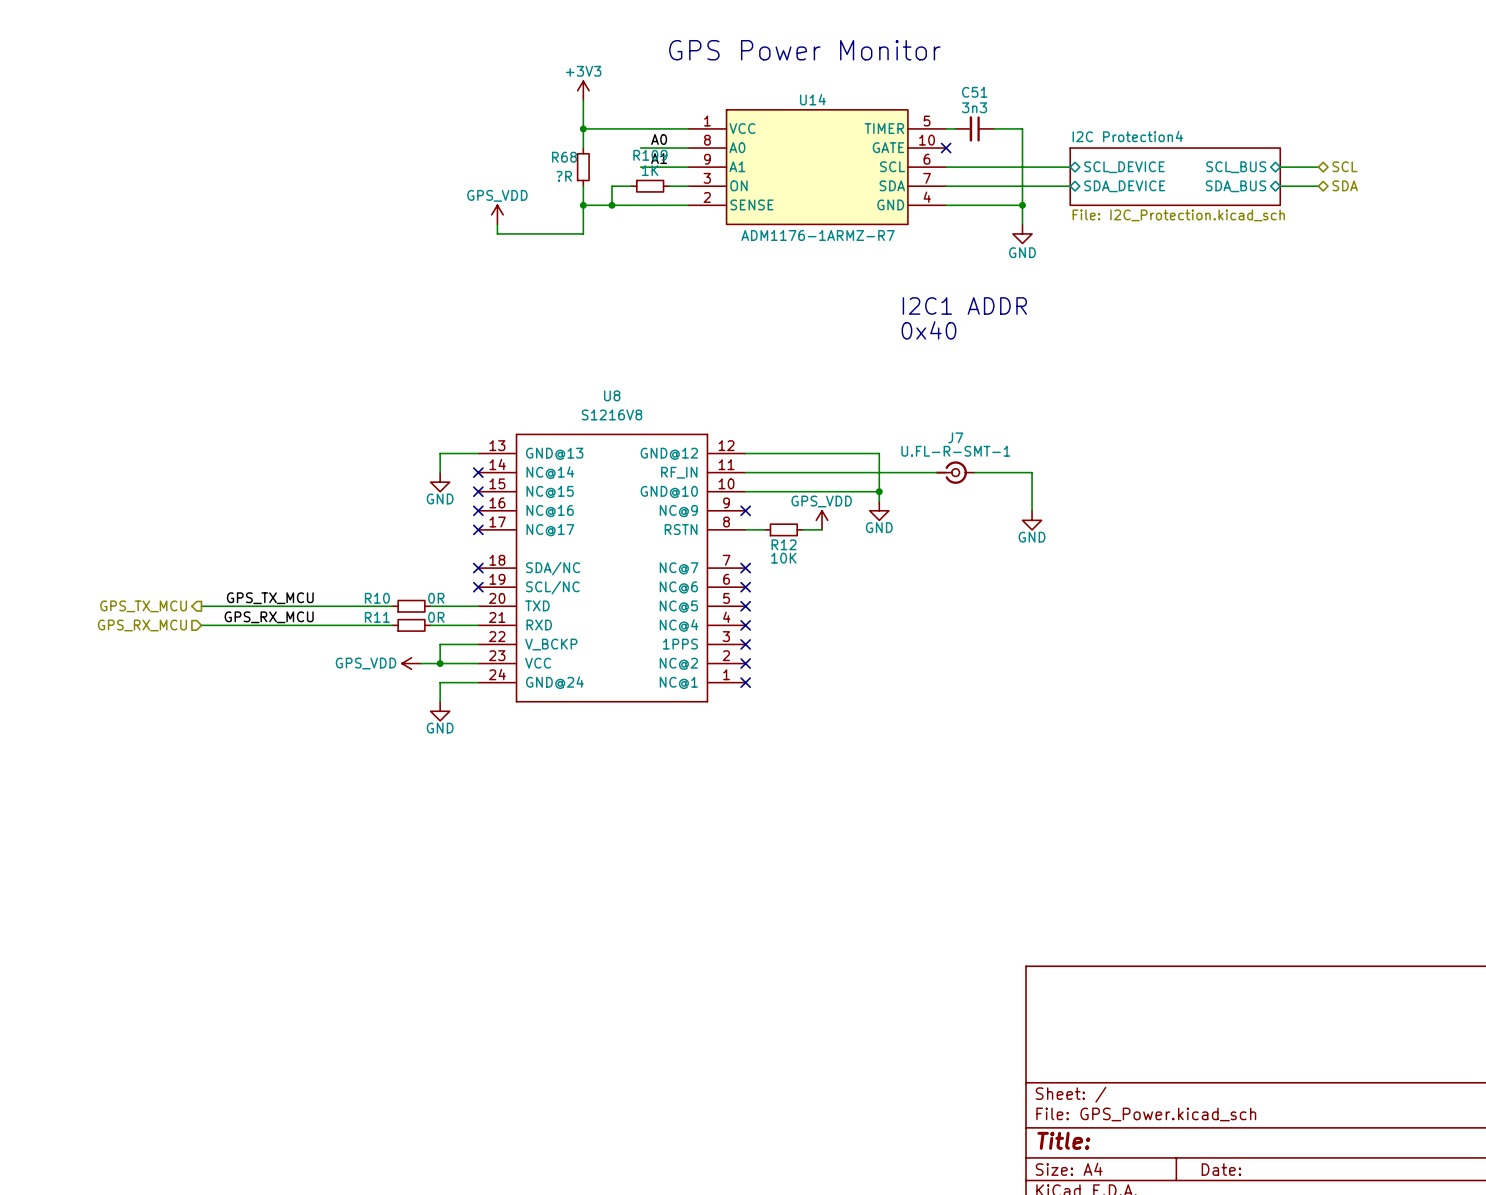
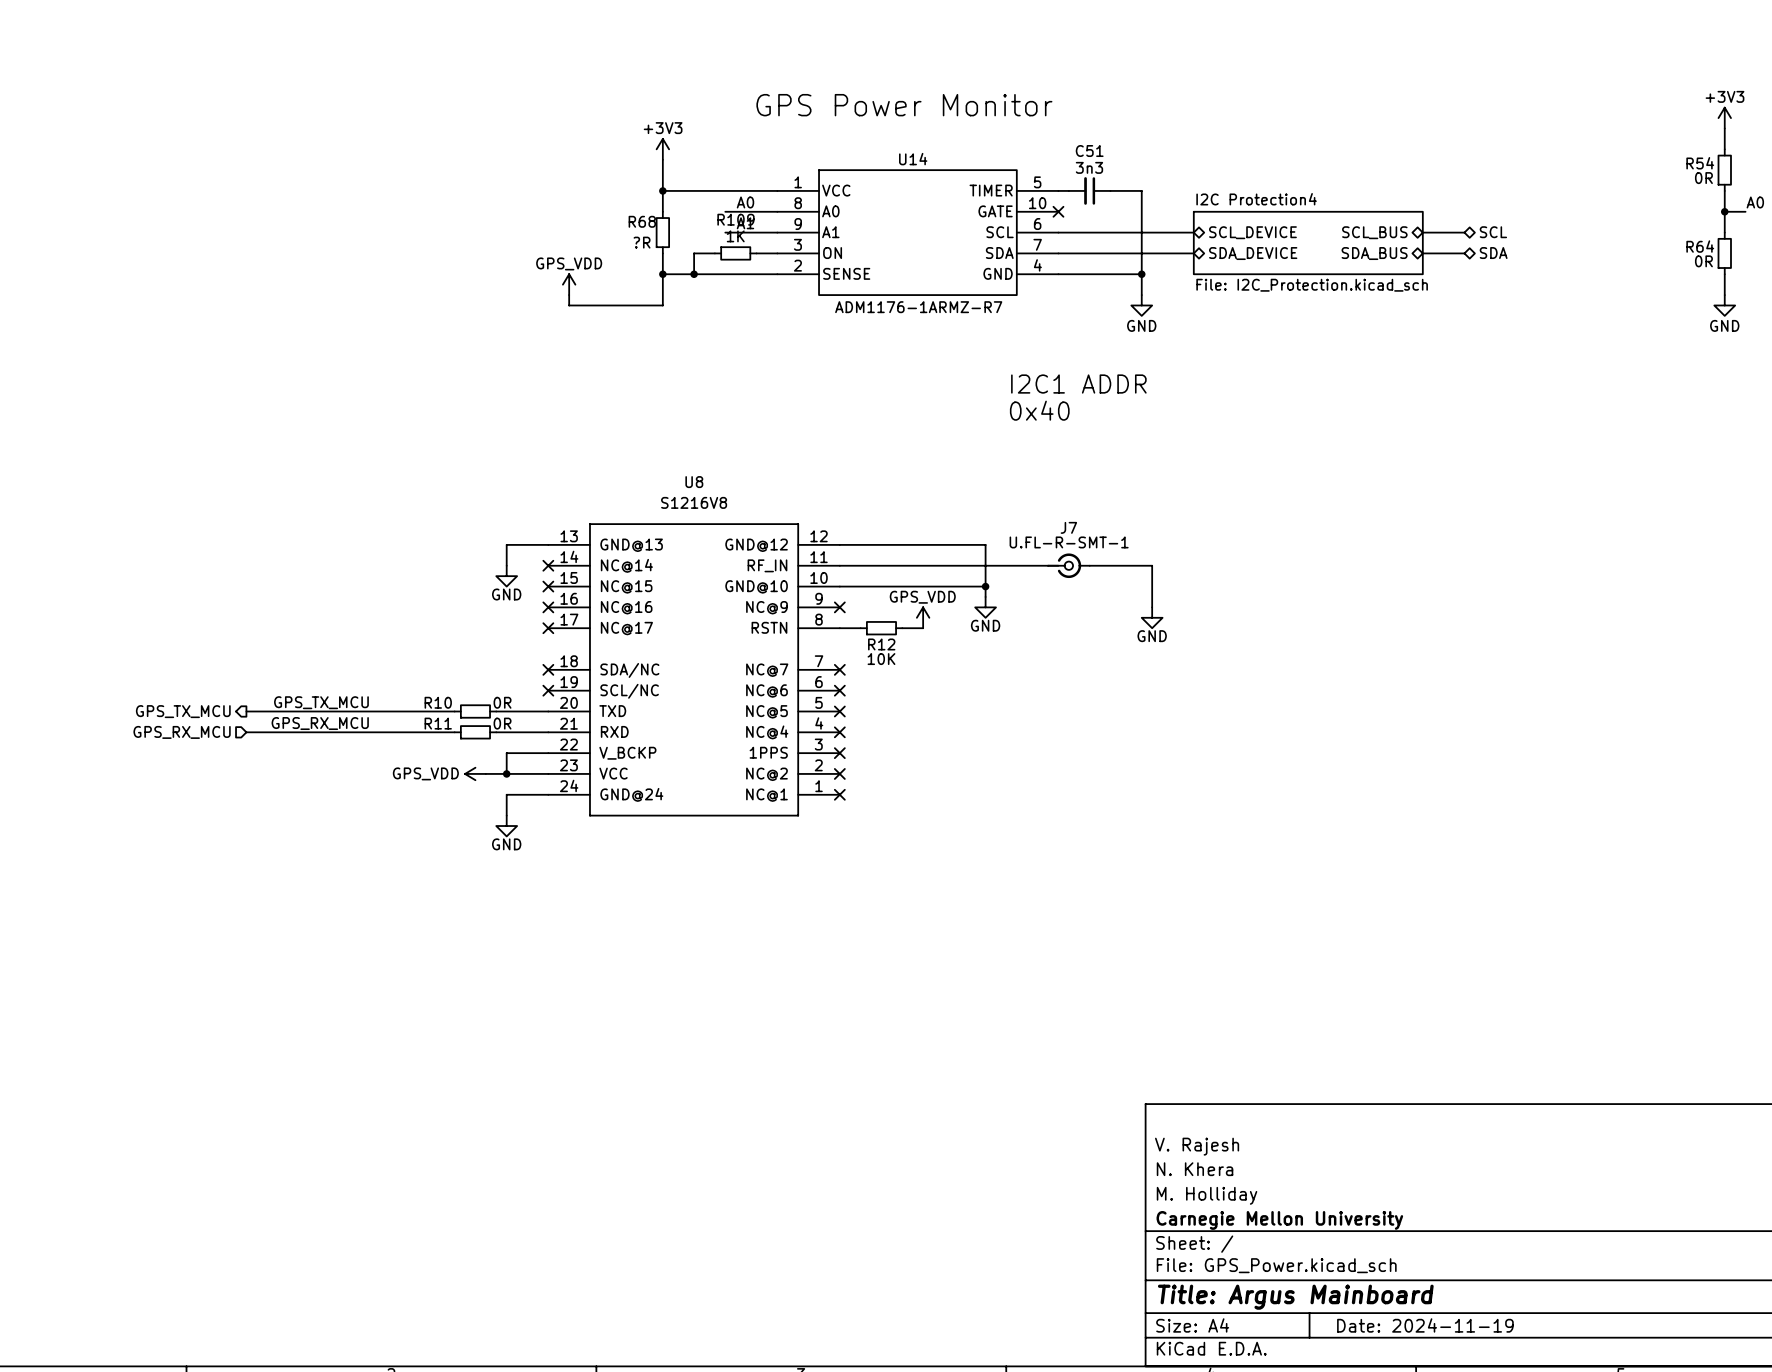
title block: none -> V. Rajesh (1197, 1146)
title block: none -> N. Khera (1195, 1169)
title block: none -> M. Holliday (1207, 1195)
title block: none -> Carnegie Mellon University (1279, 1220)
title block: Title: (1063, 1140) -> Title: Argus Mainboard (1295, 1297)
title block: Date: (1221, 1169) -> Date: 2024-11-19 (1425, 1325)

